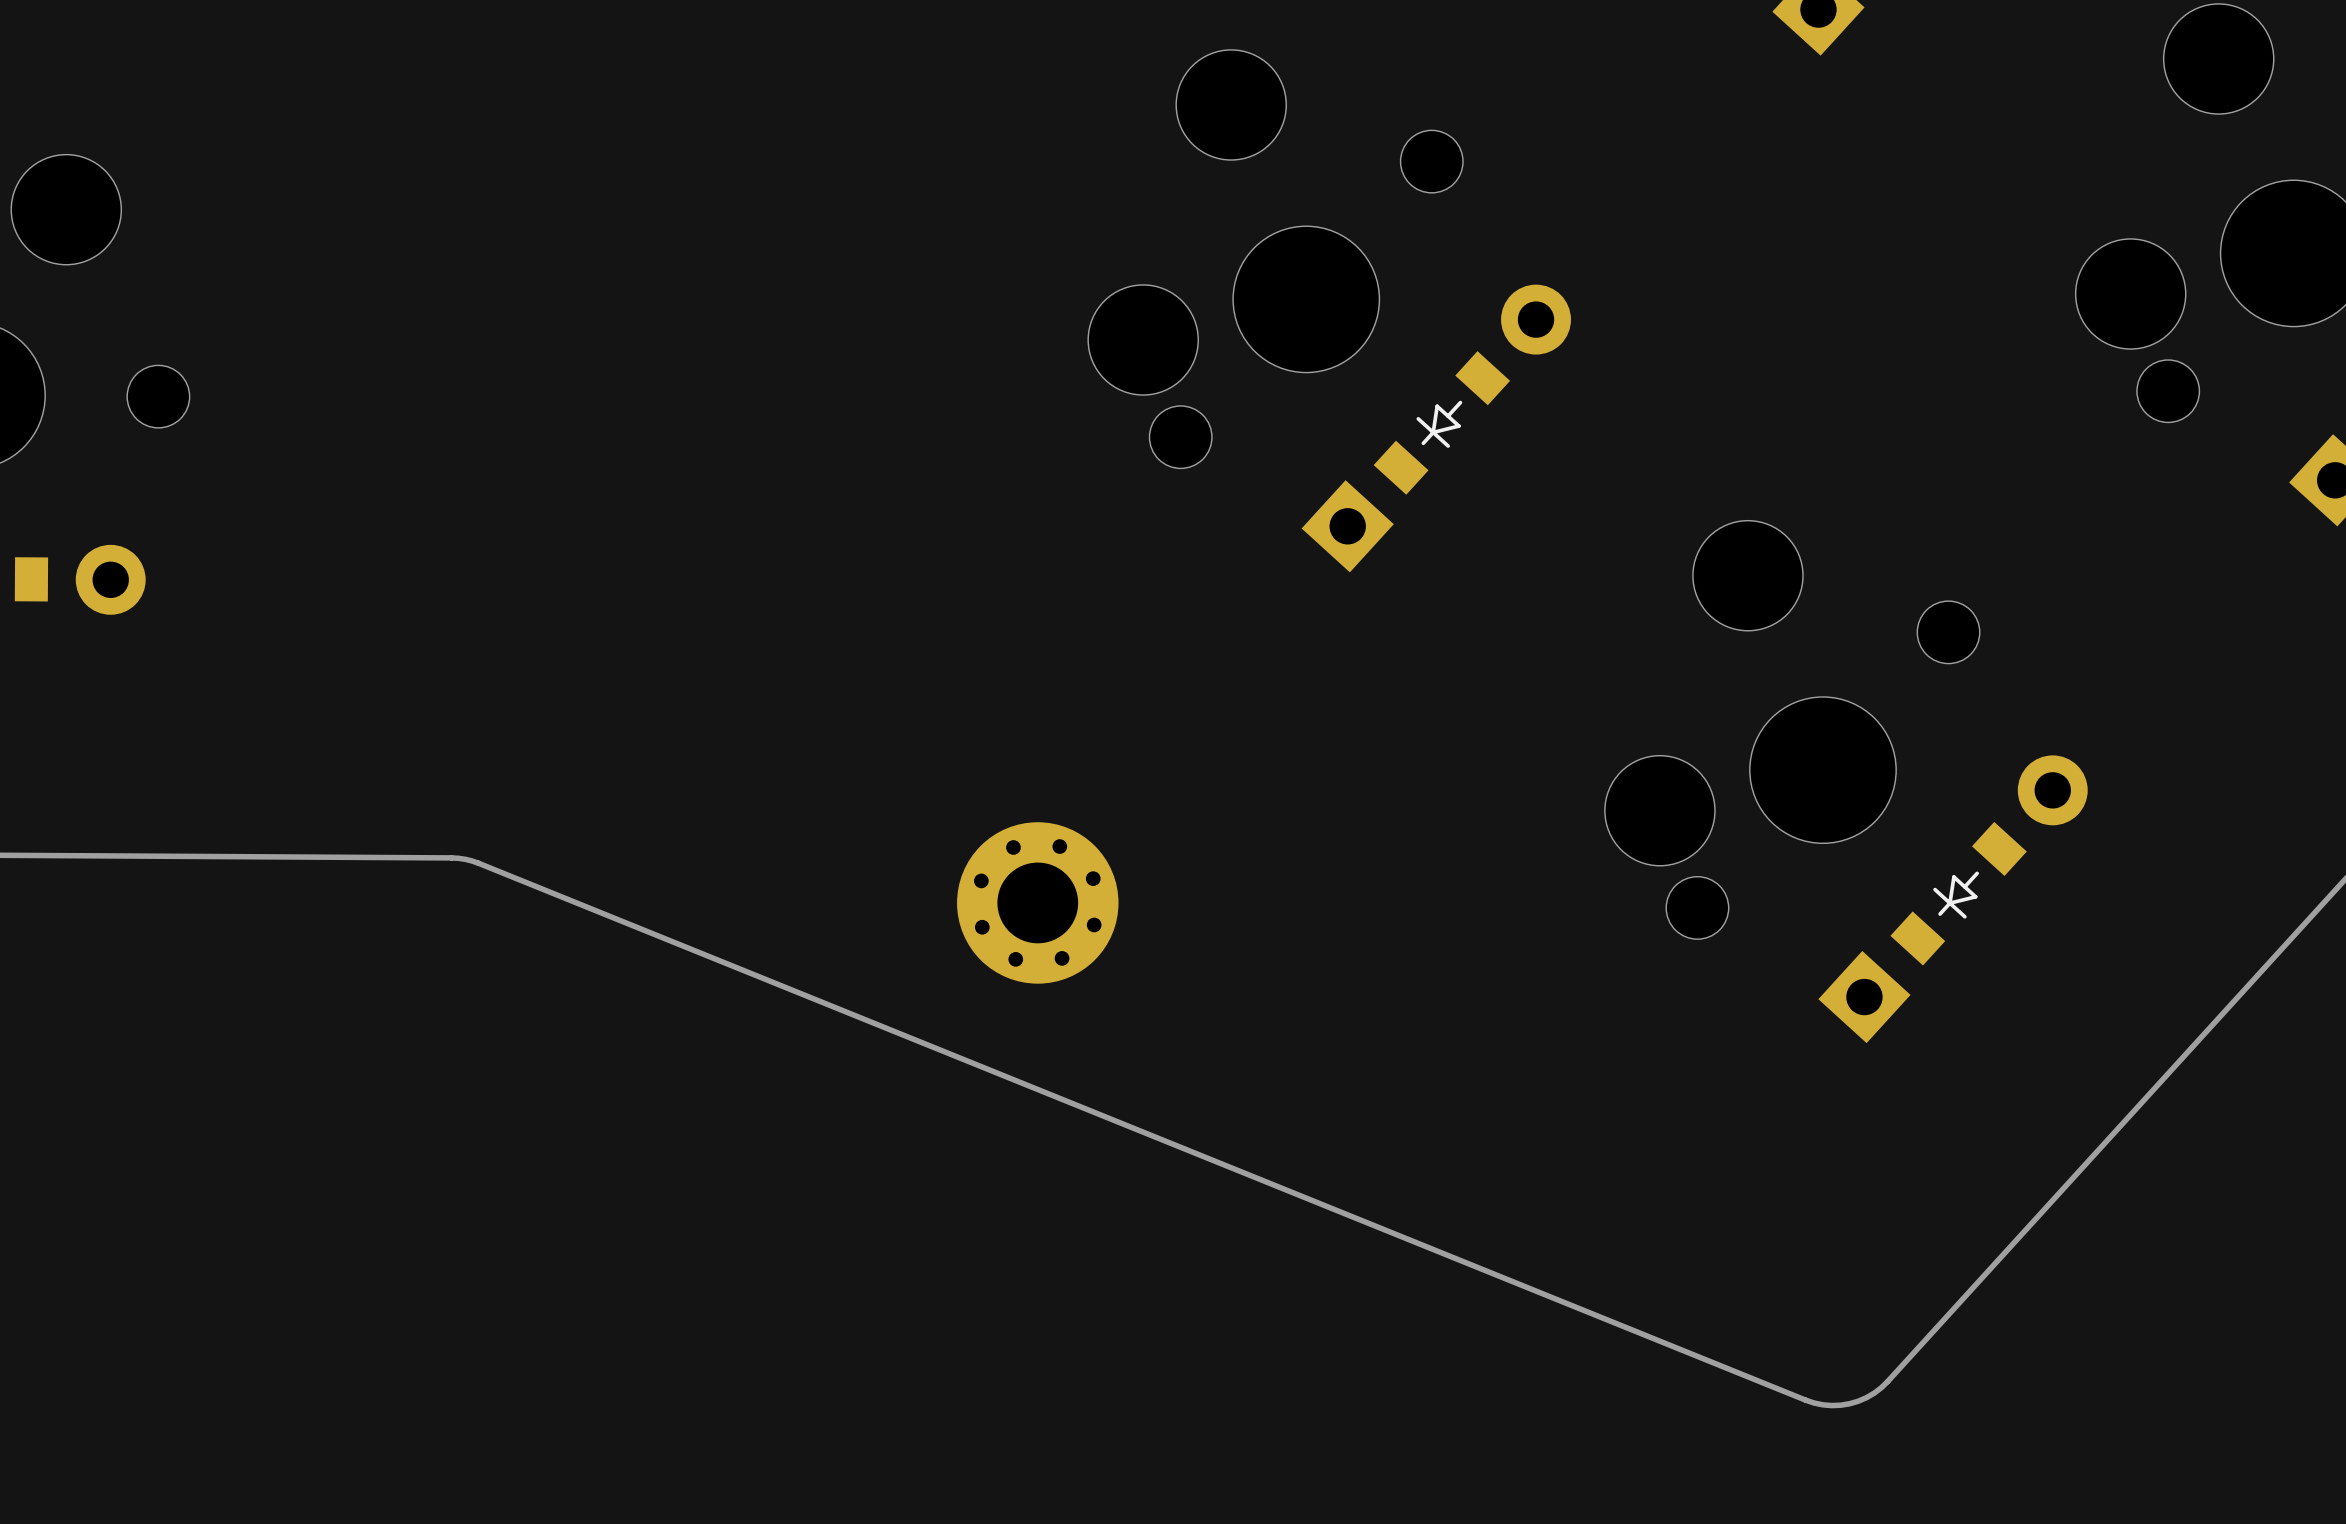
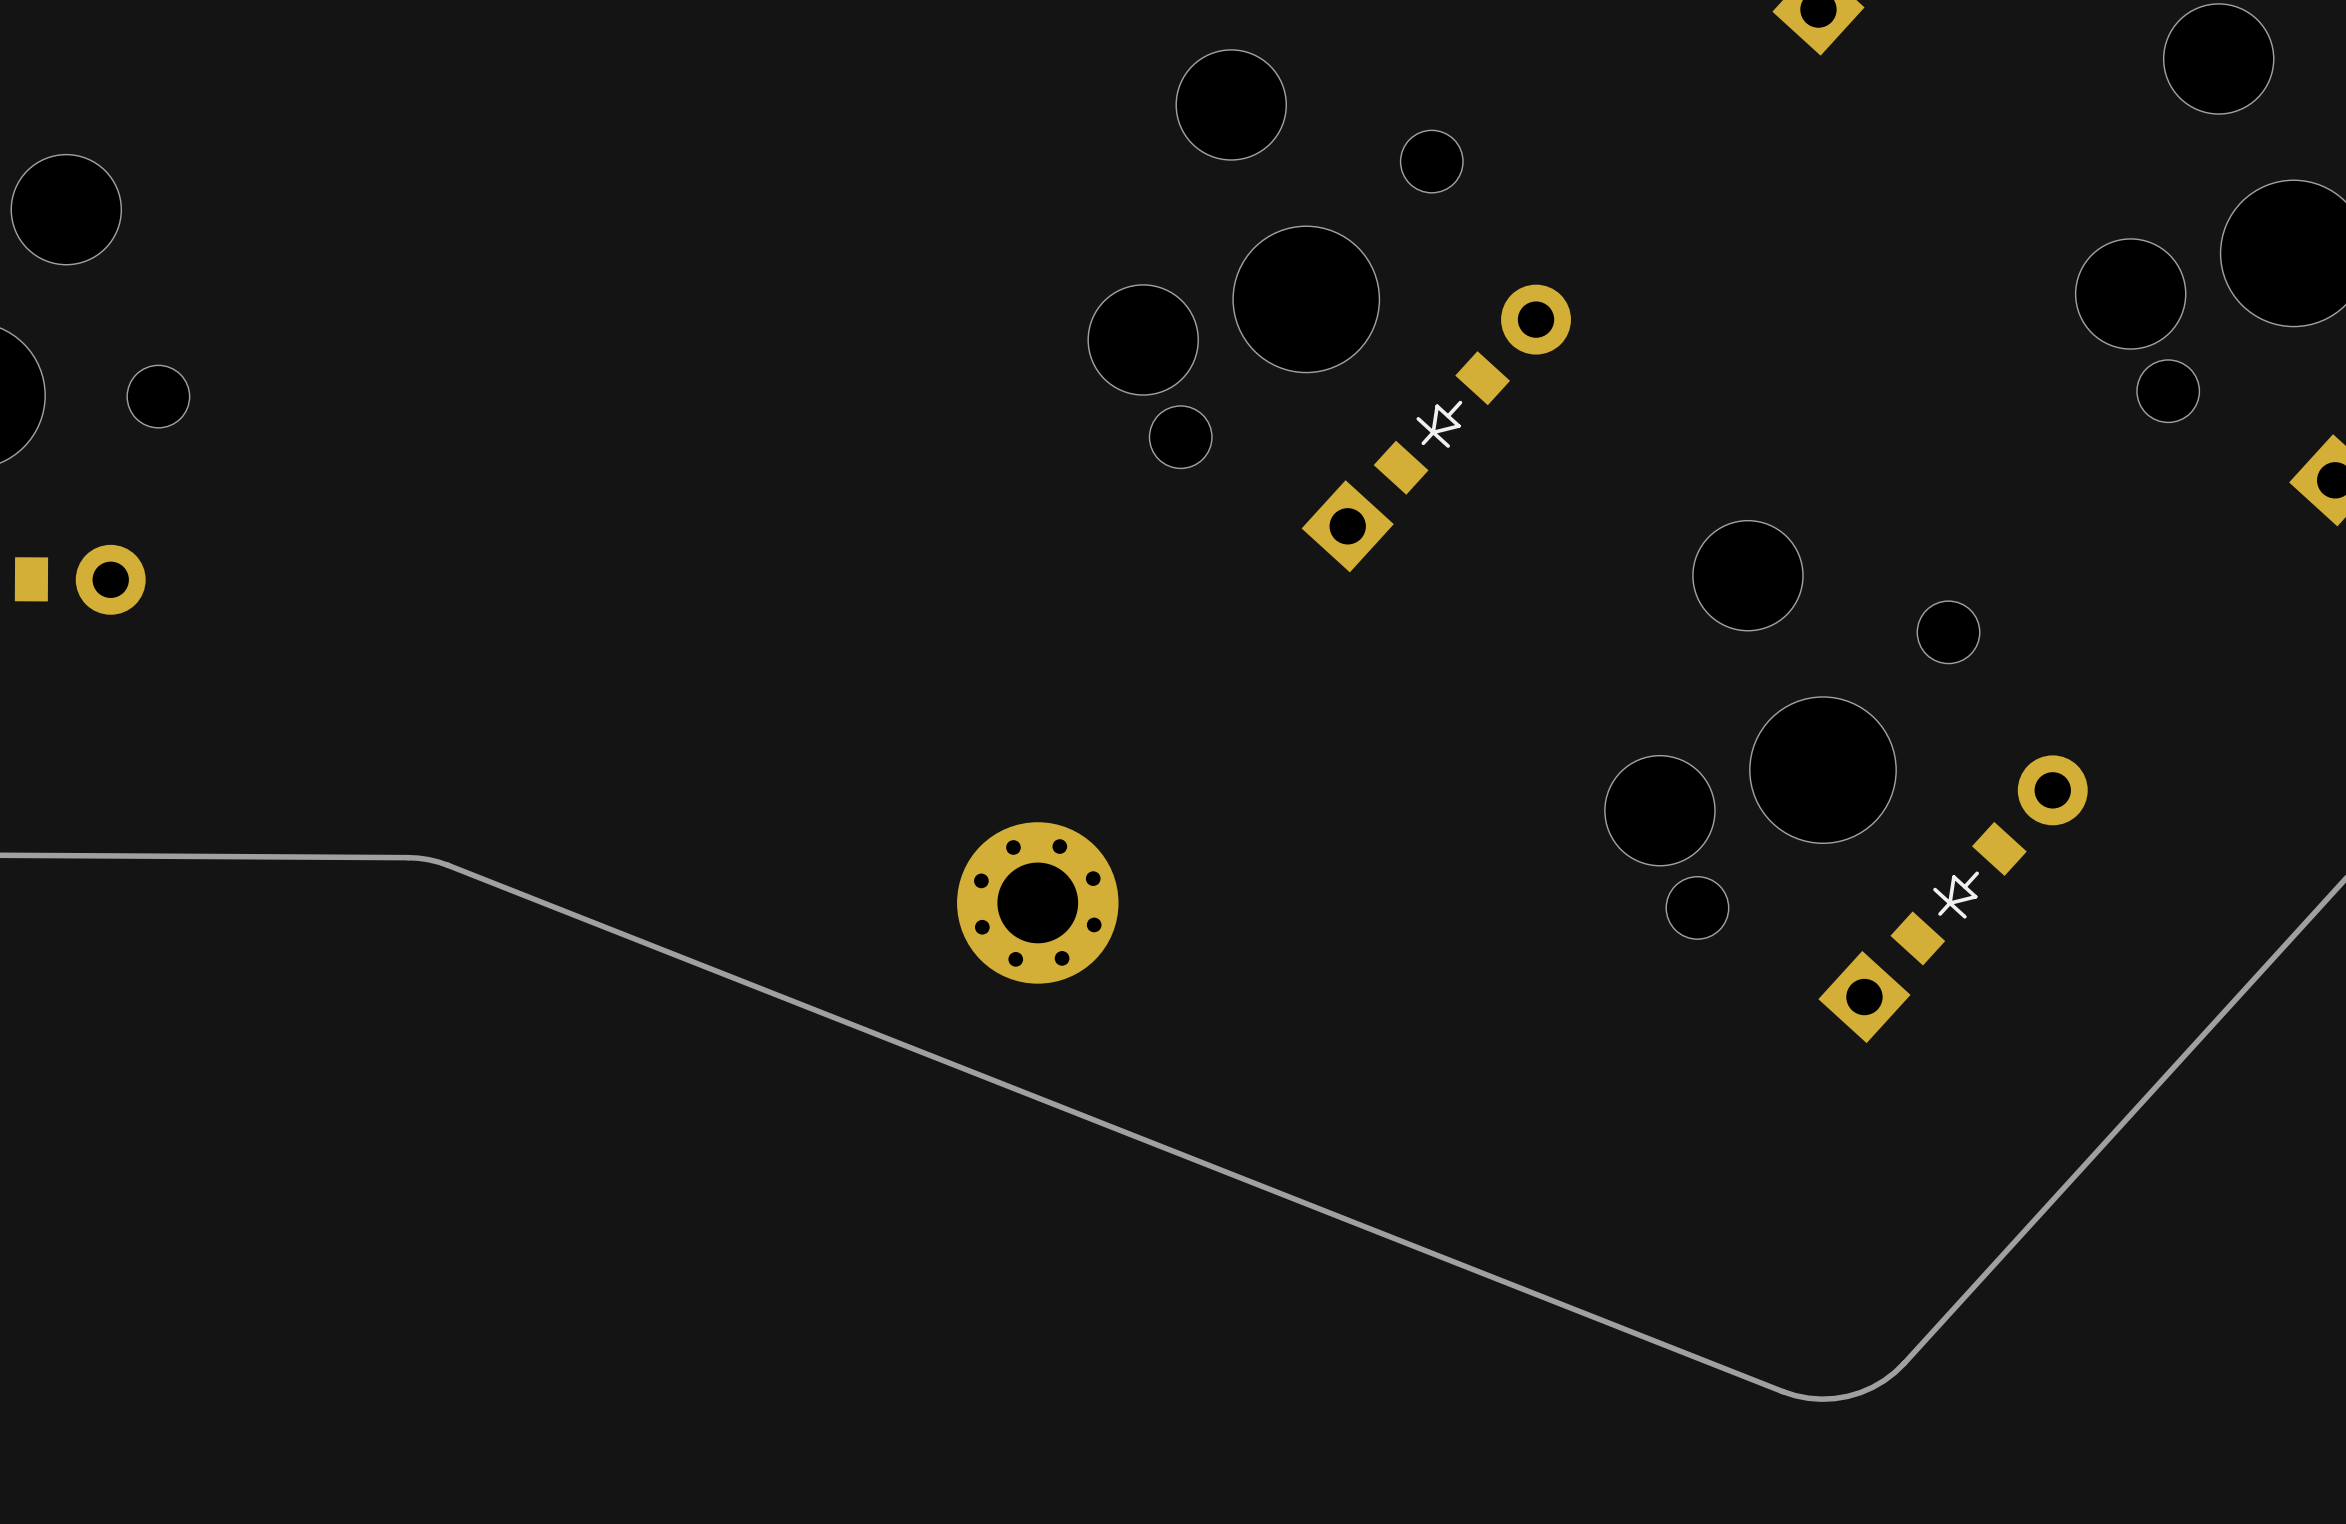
board edge: (408, 857) (458, 858) (478, 863) (1805, 1400) (1831, 1405) (1858, 1401) (1881, 1387) (1904, 1363) -> (408, 857) (428, 859) (448, 865) (1782, 1391) (1795, 1395) (1821, 1399) (1847, 1396) (1860, 1392) (1884, 1380) (1904, 1363)

